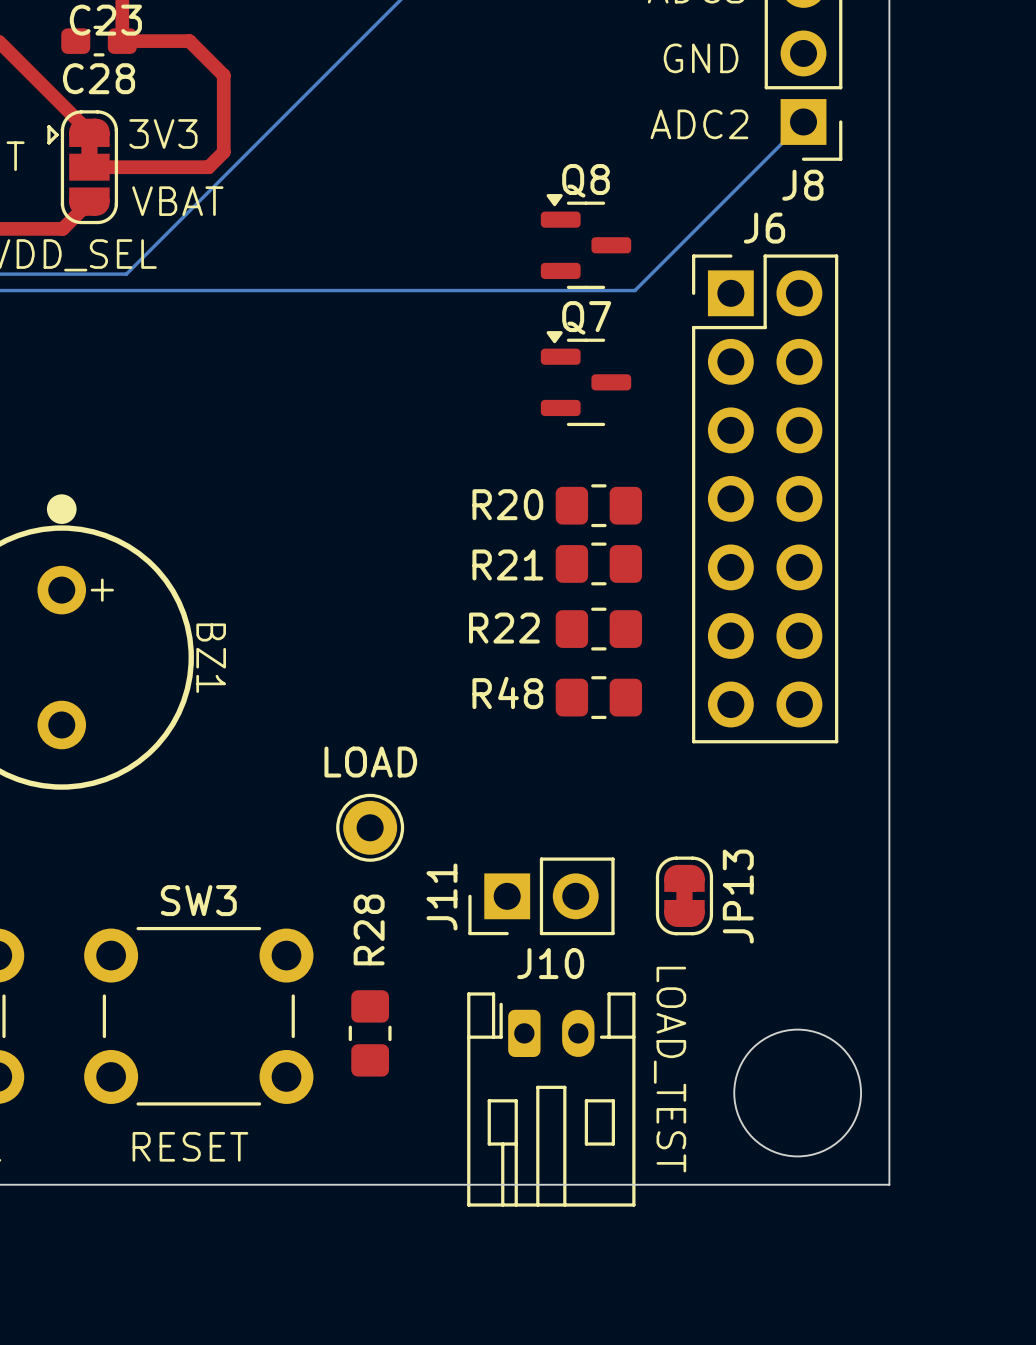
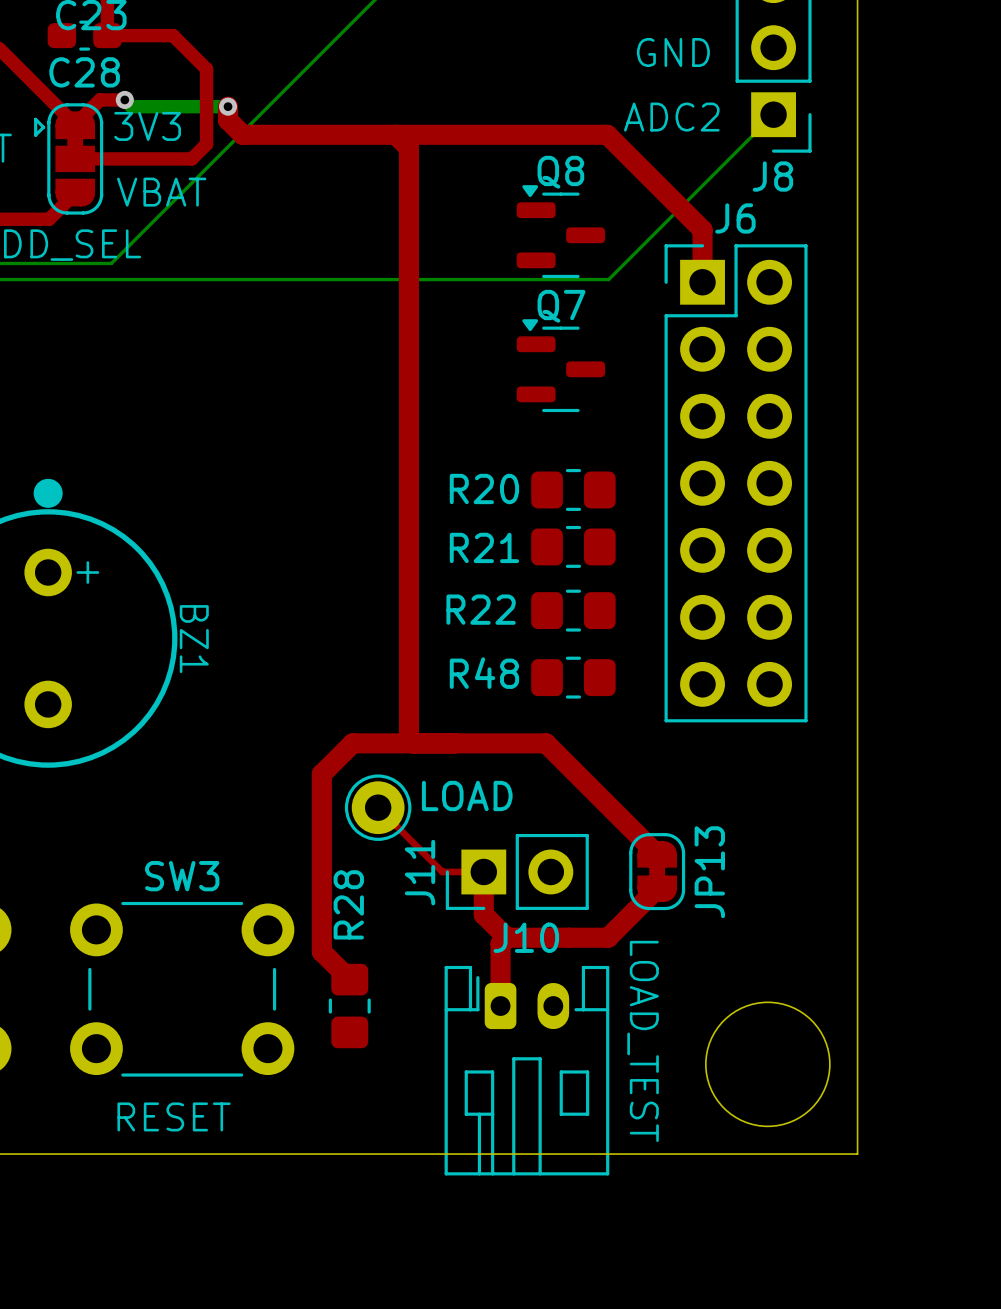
top track: none -> (124, 99) (99, 99) (75, 124)
bottom track: none -> (124, 99) (131, 106) (228, 106)
via: none -> (124, 99)
top track: none -> (228, 106) (228, 120) (242, 134) (607, 134) (702, 229) (702, 282)
via: none -> (228, 106)
top track: none -> (395, 134) (408, 148) (408, 739) (413, 743)
part: (370, 827) -> none
top track: none -> (378, 807) (442, 871) (483, 871) (483, 914) (506, 937)
part: none -> (378, 807)
top track: none -> (657, 854) (546, 743) (352, 743) (321, 774) (321, 951) (349, 979)
top track: none -> (657, 888) (608, 937) (506, 937)
top track: none -> (506, 937) (500, 944) (500, 1006)

